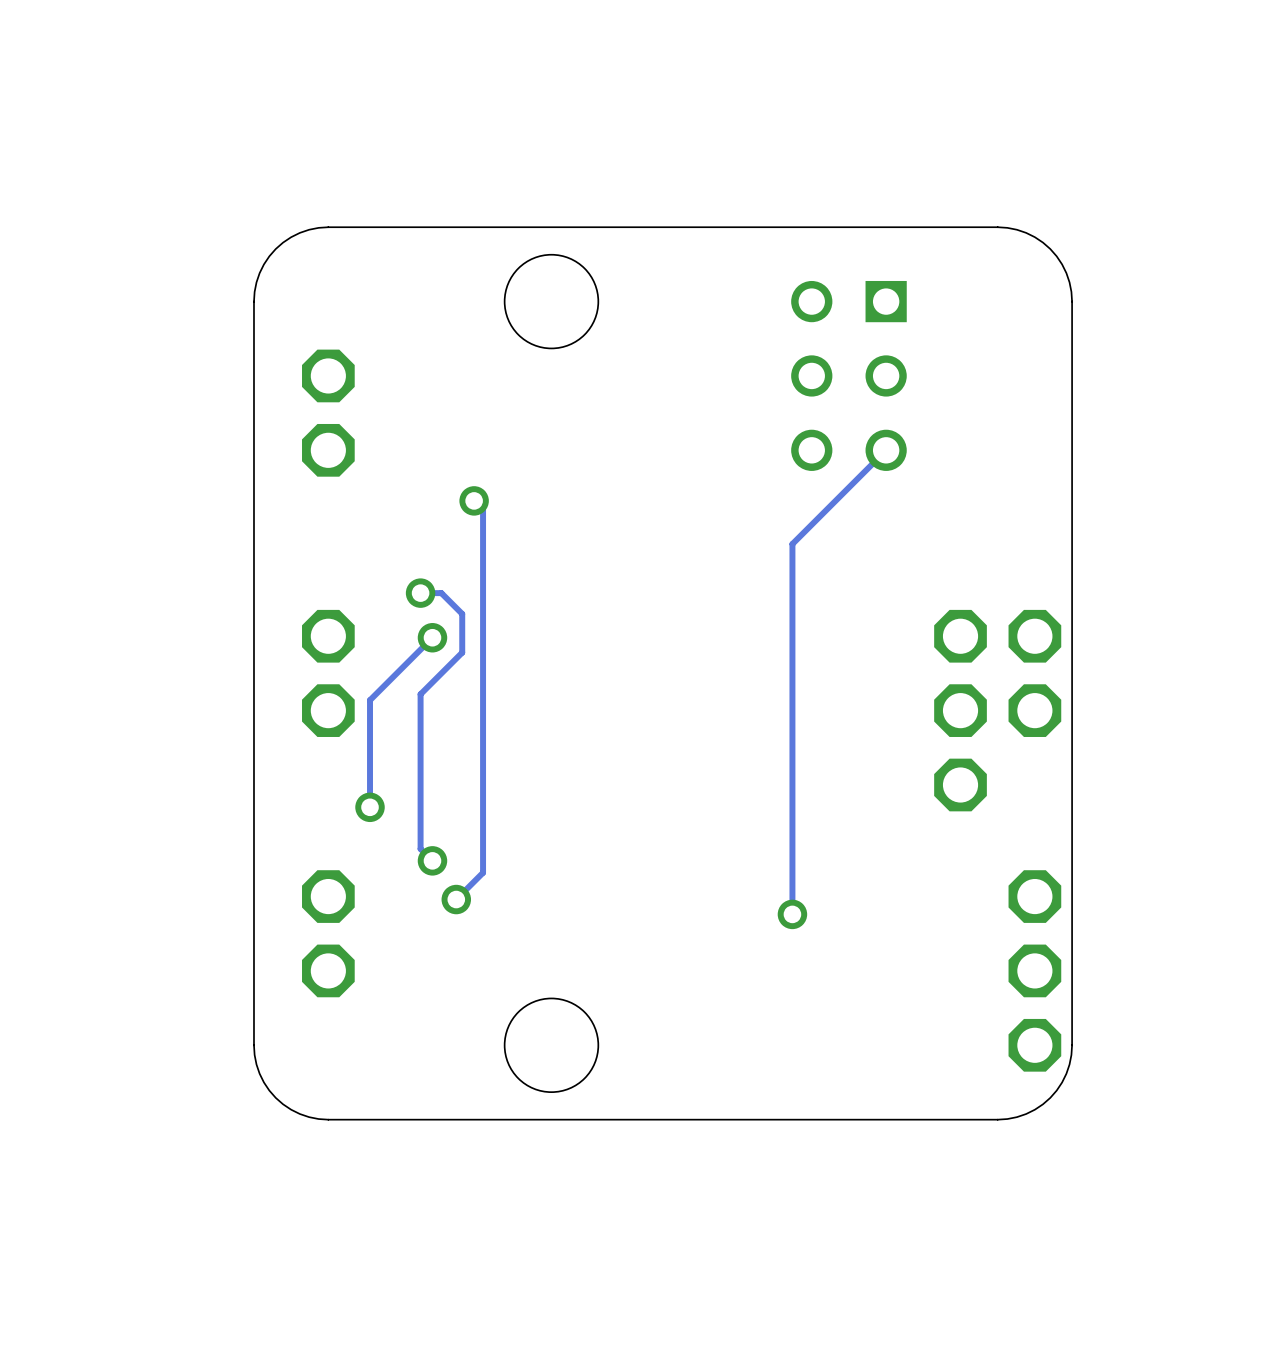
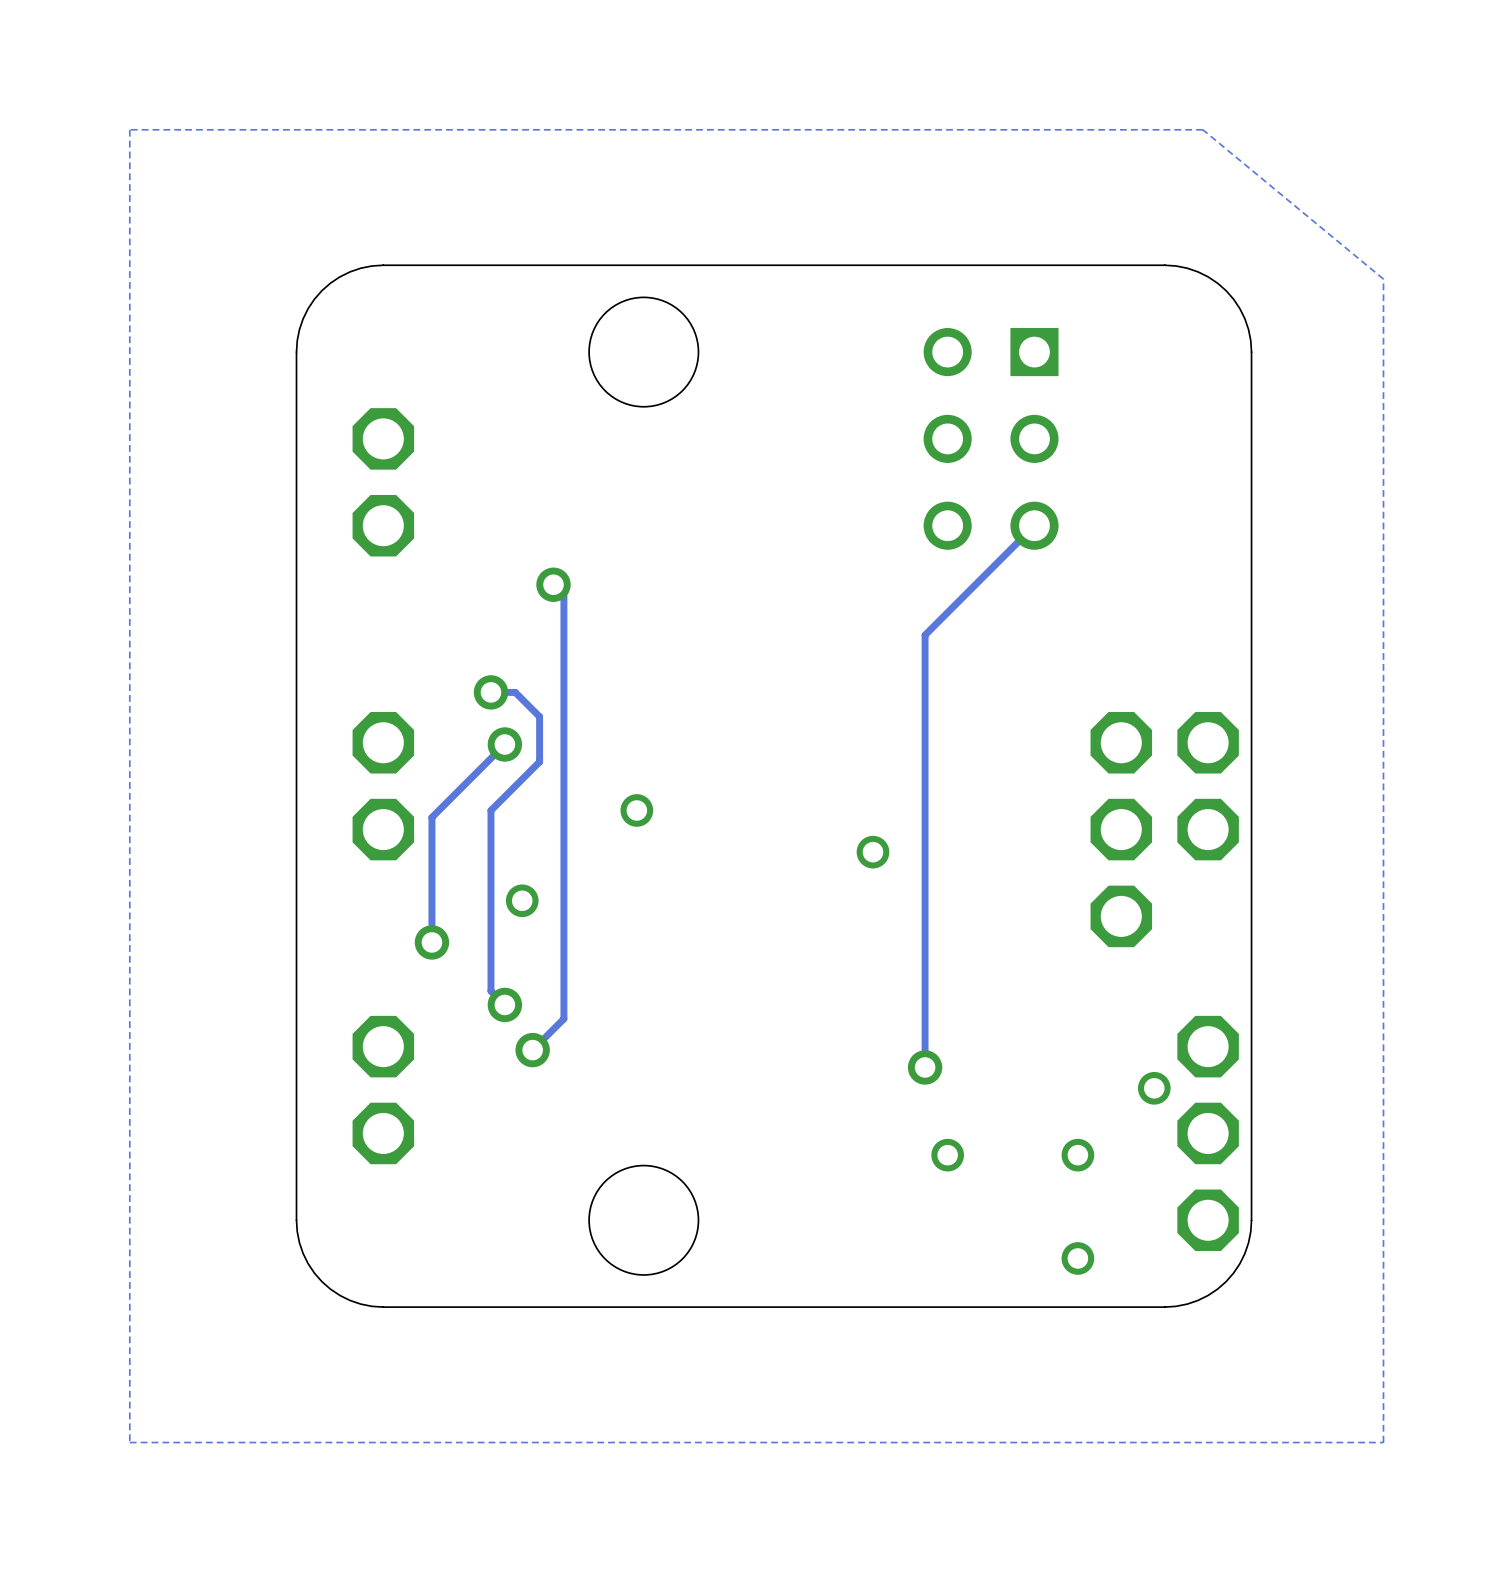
zone outline: none -> (1202, 129) (129, 129) (129, 1442) (1383, 1442) (1383, 279) (1202, 129)
via: none -> (636, 810)
via: none -> (872, 852)
via: none -> (522, 900)
via: none -> (1154, 1088)
via: none -> (947, 1155)
via: none -> (1077, 1155)
via: none -> (1077, 1258)

